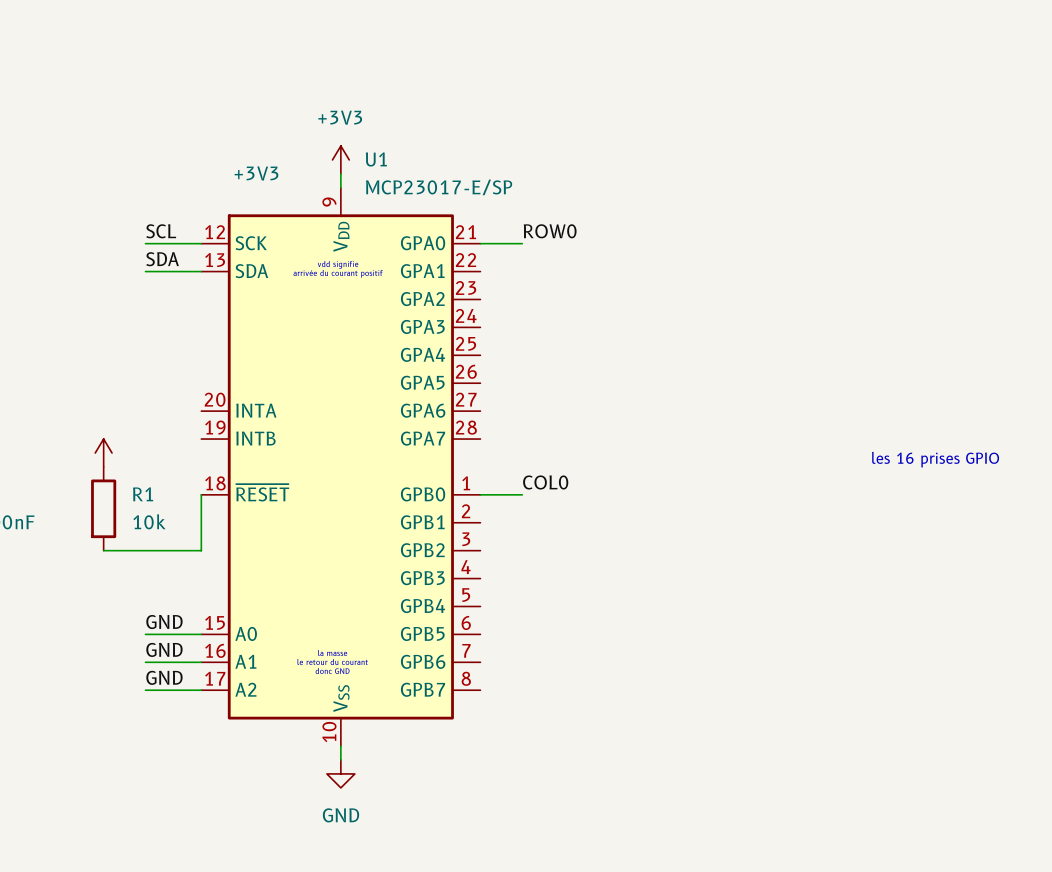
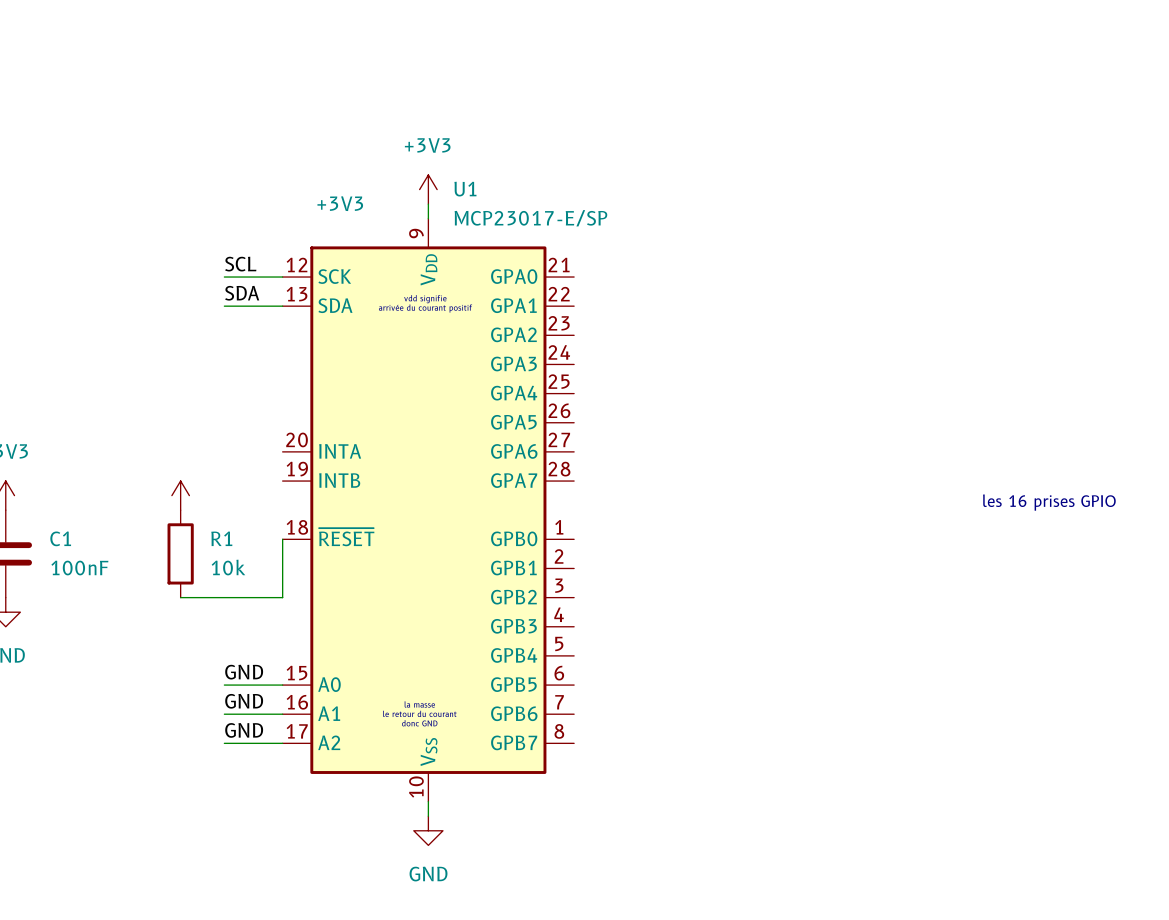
label: ROW0 (550, 231) -> none
wire: (480, 243) (522, 243) -> none
label: COL0 (545, 482) -> none
wire: (480, 494) (522, 494) -> none

